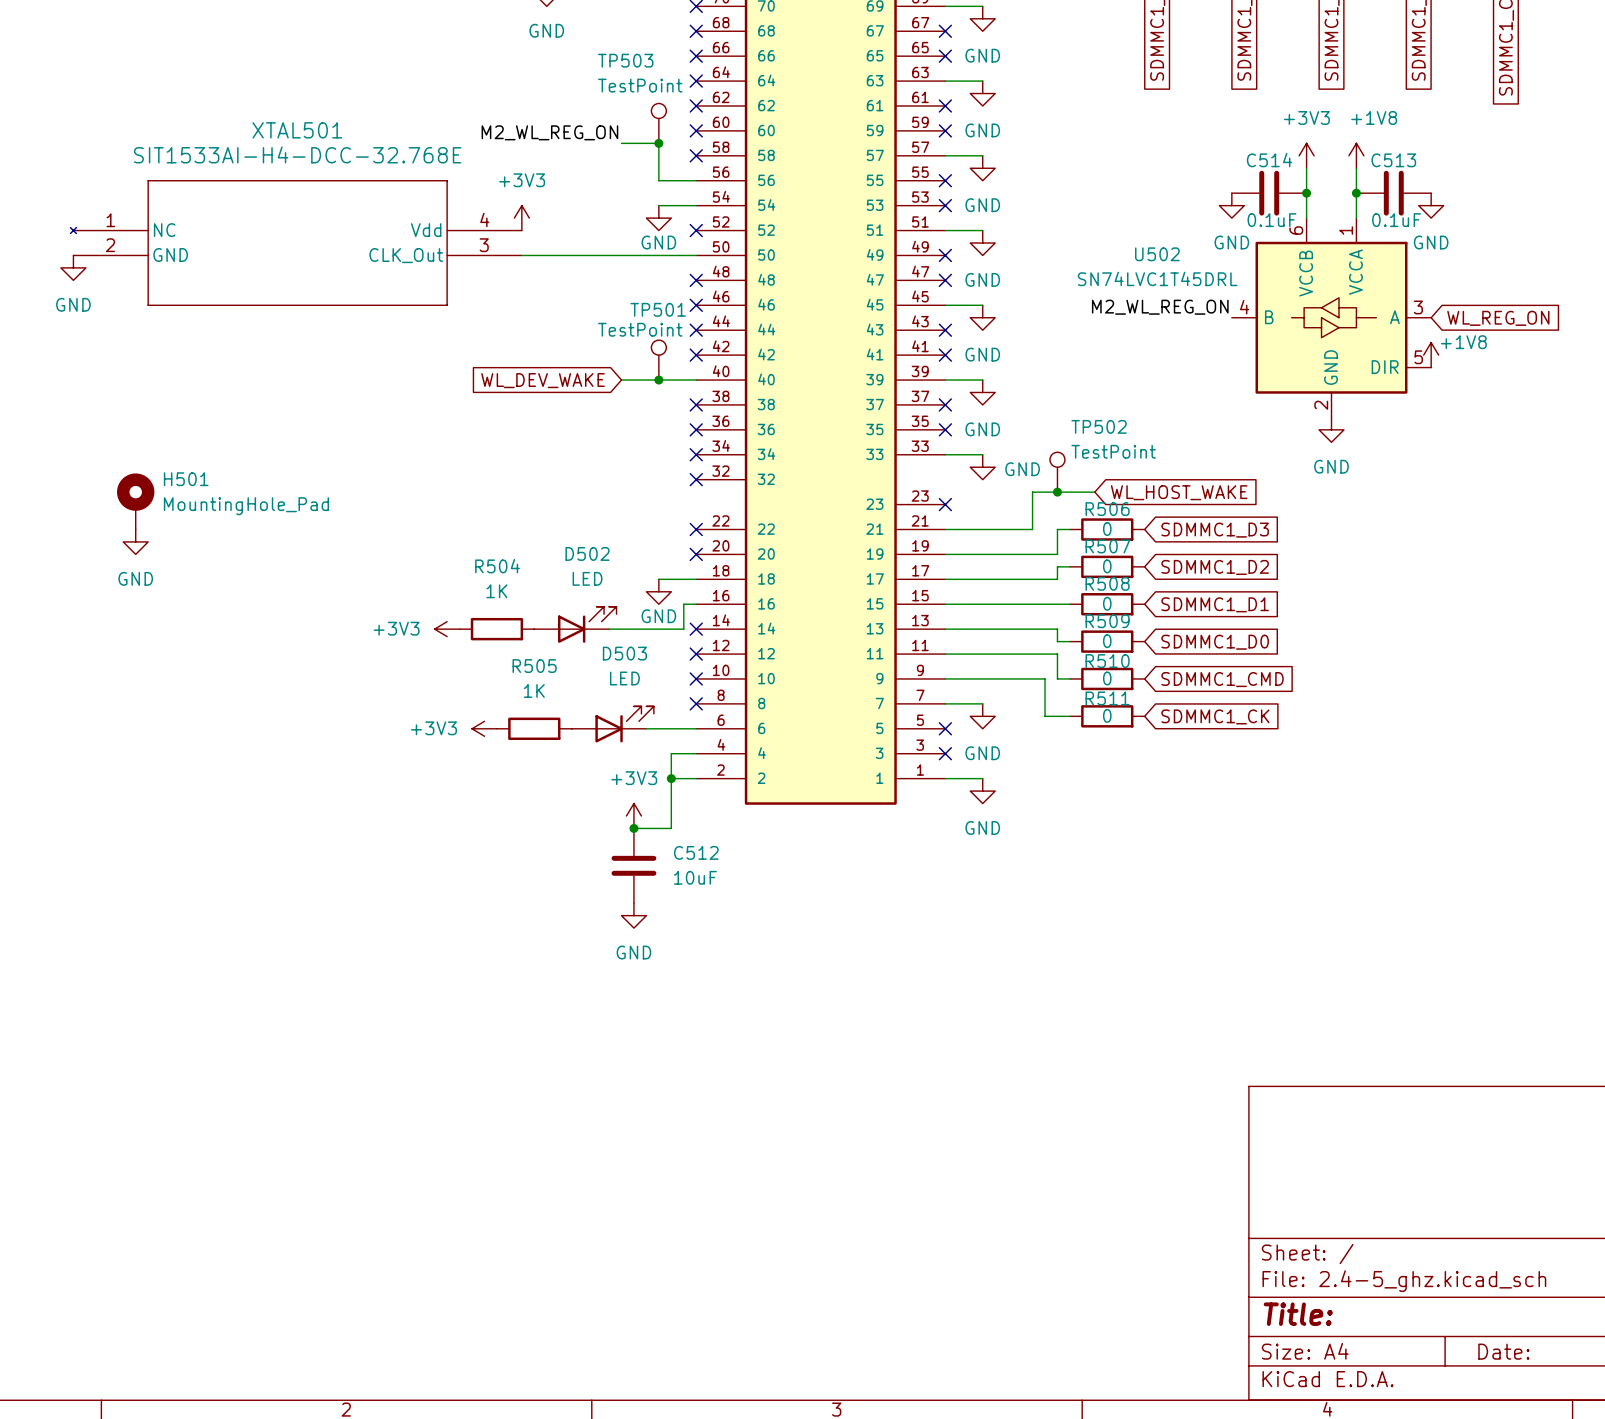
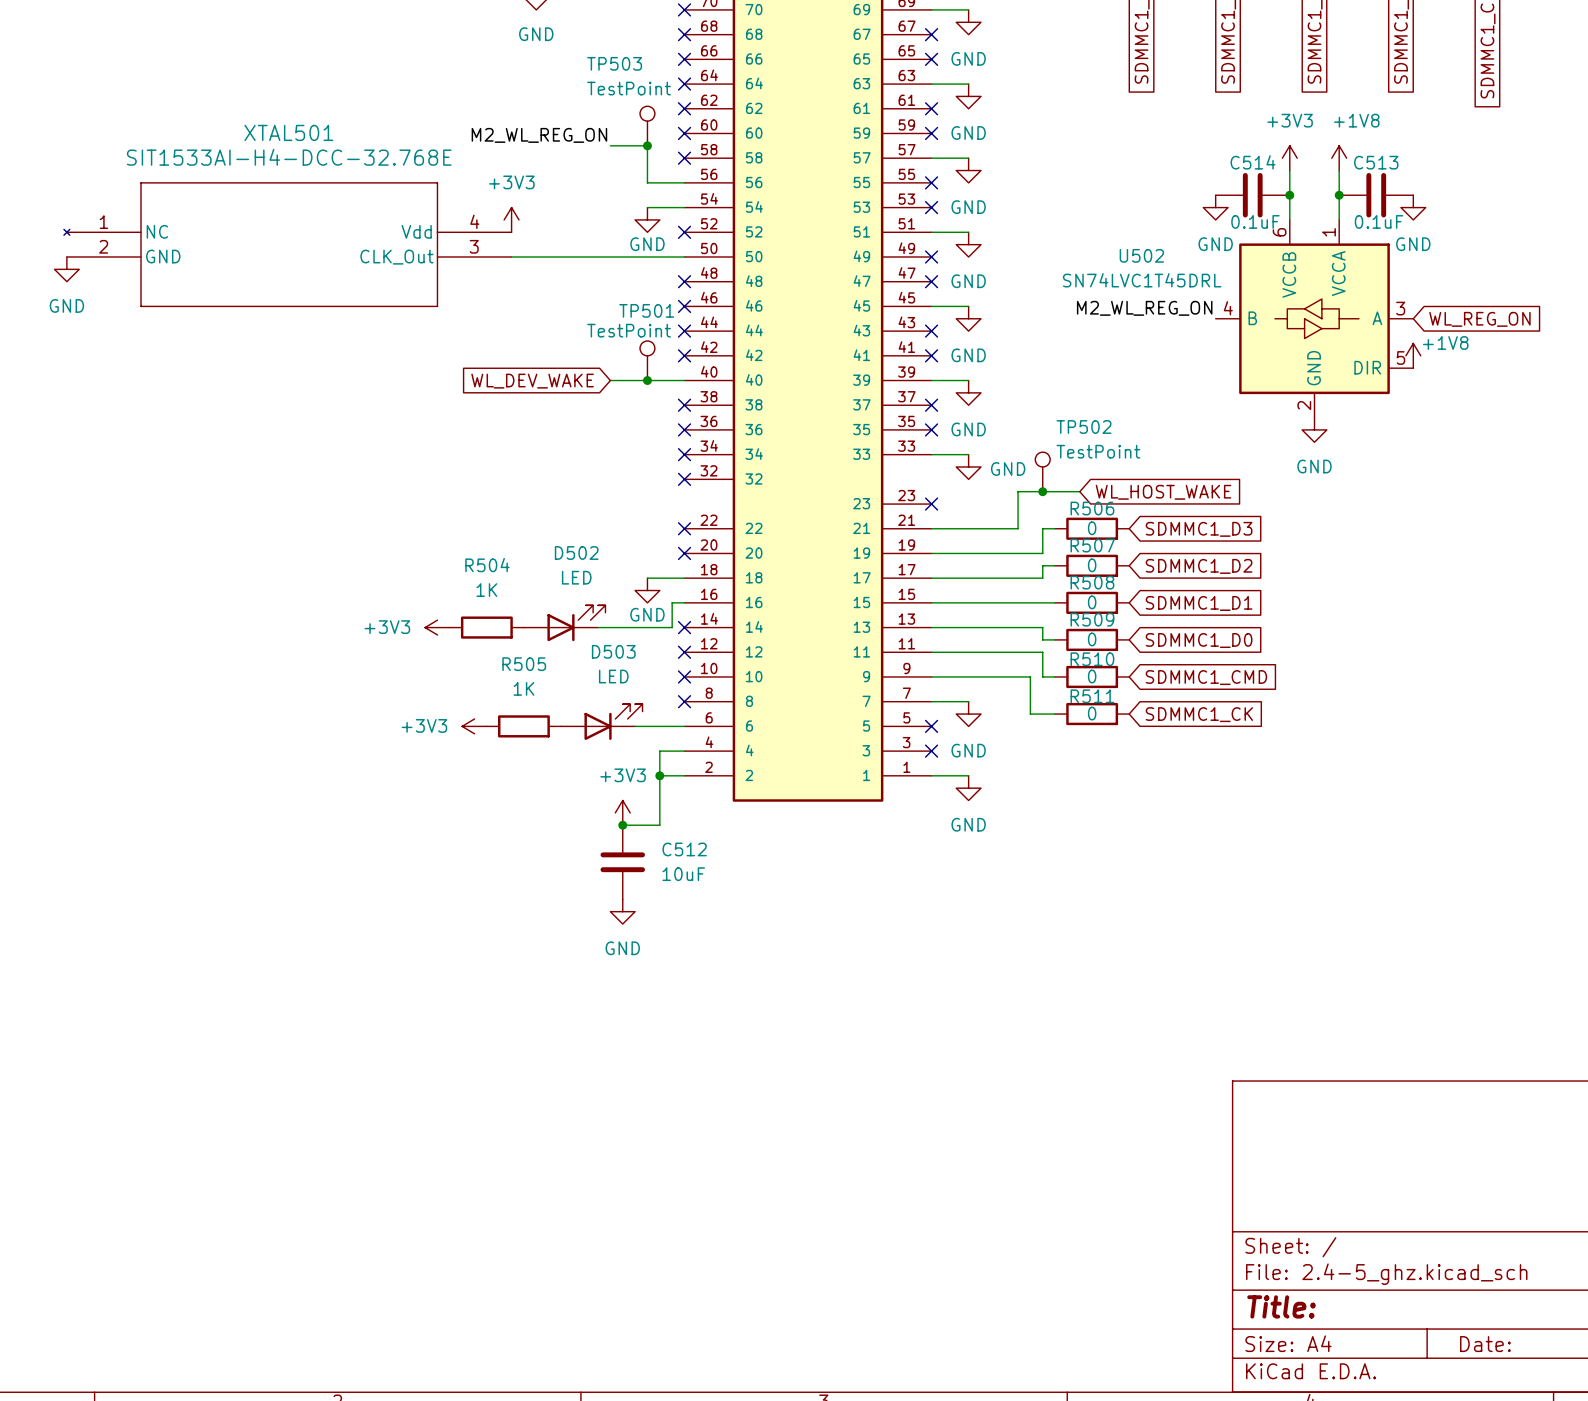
H501: MountingHole_Pad (135, 501) -> none
power symbol: GND (135, 541) -> none

